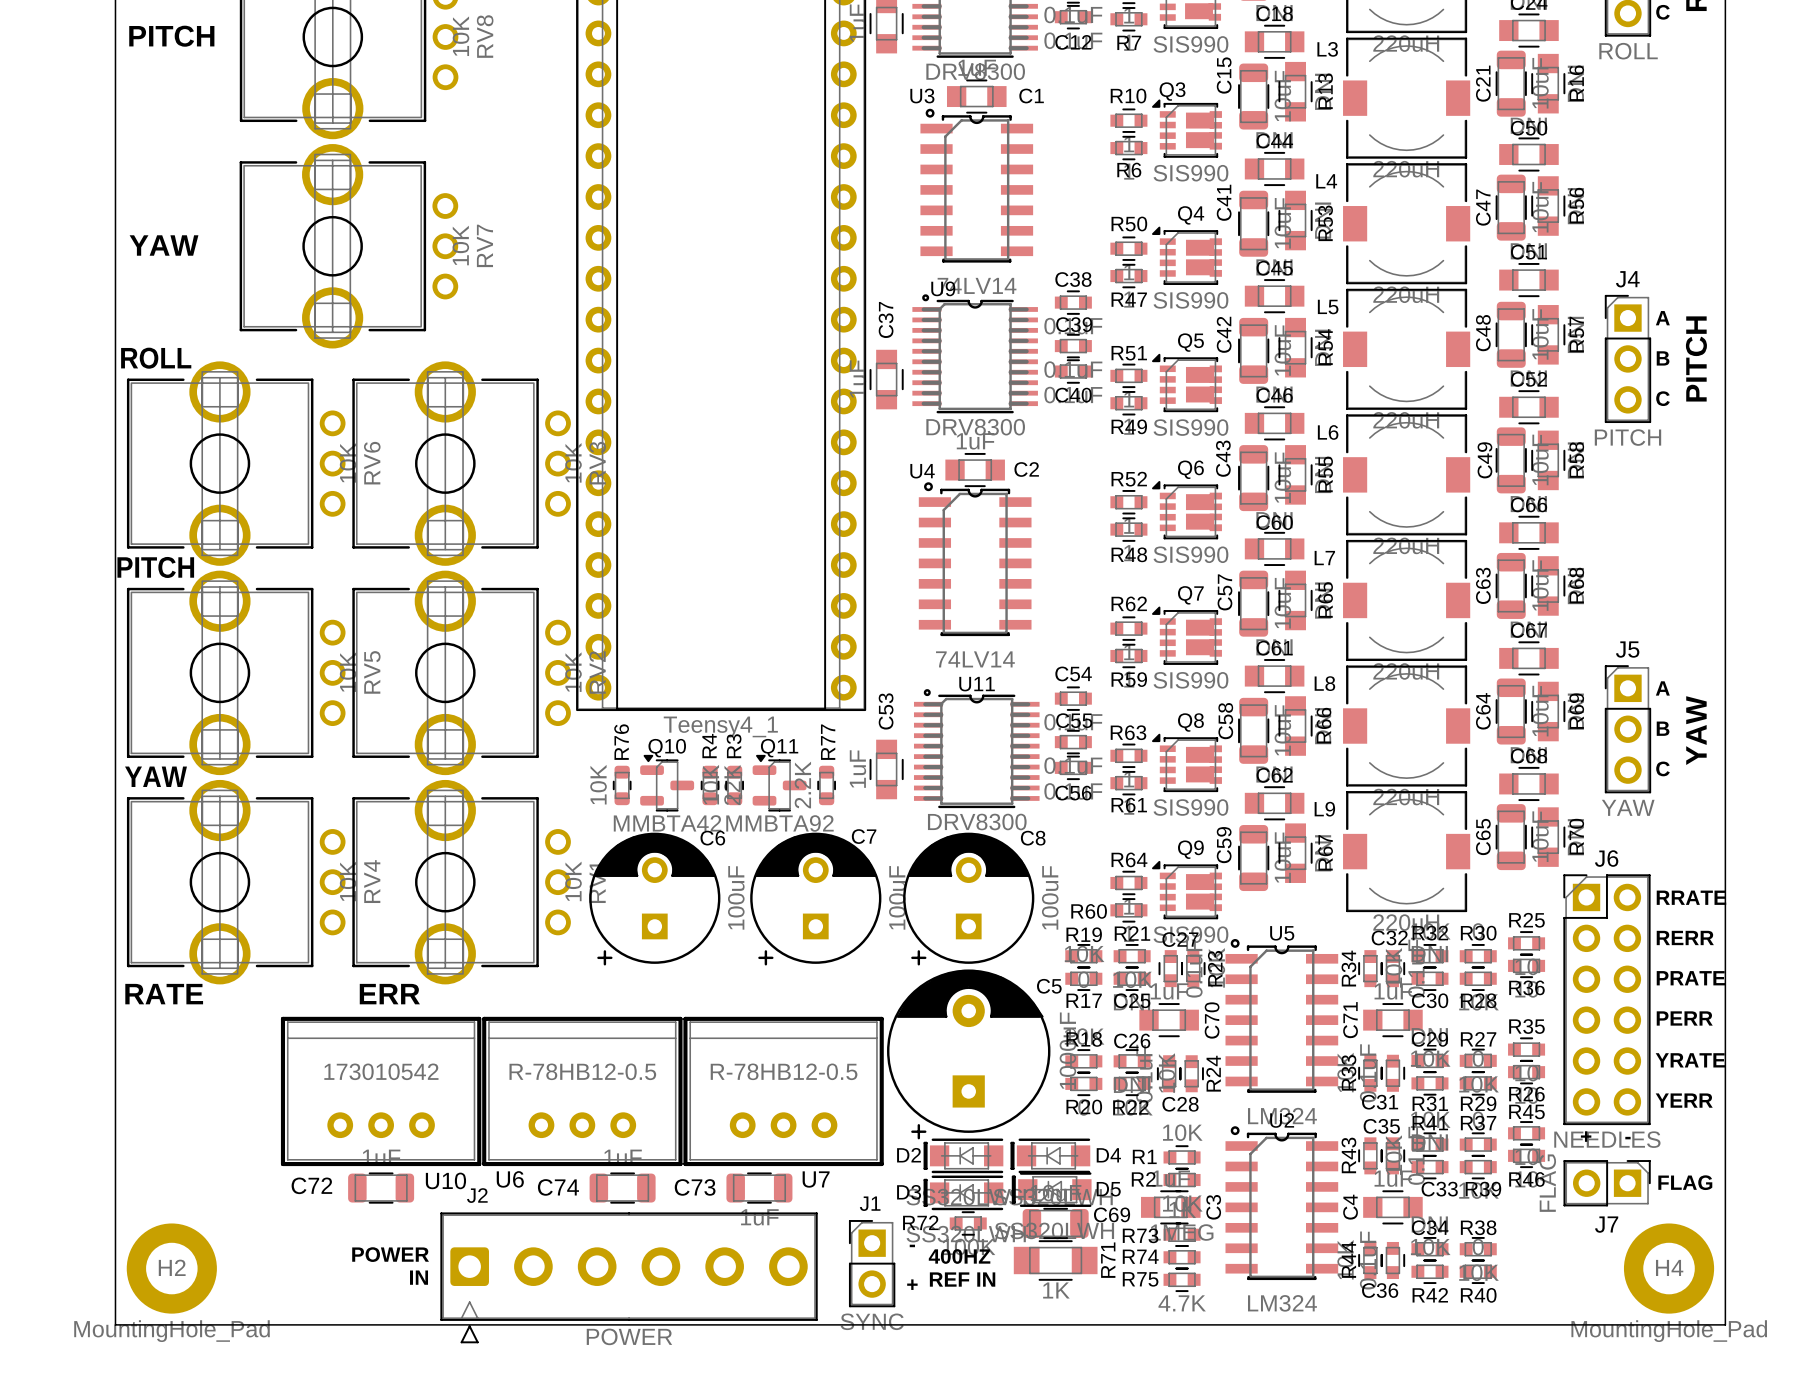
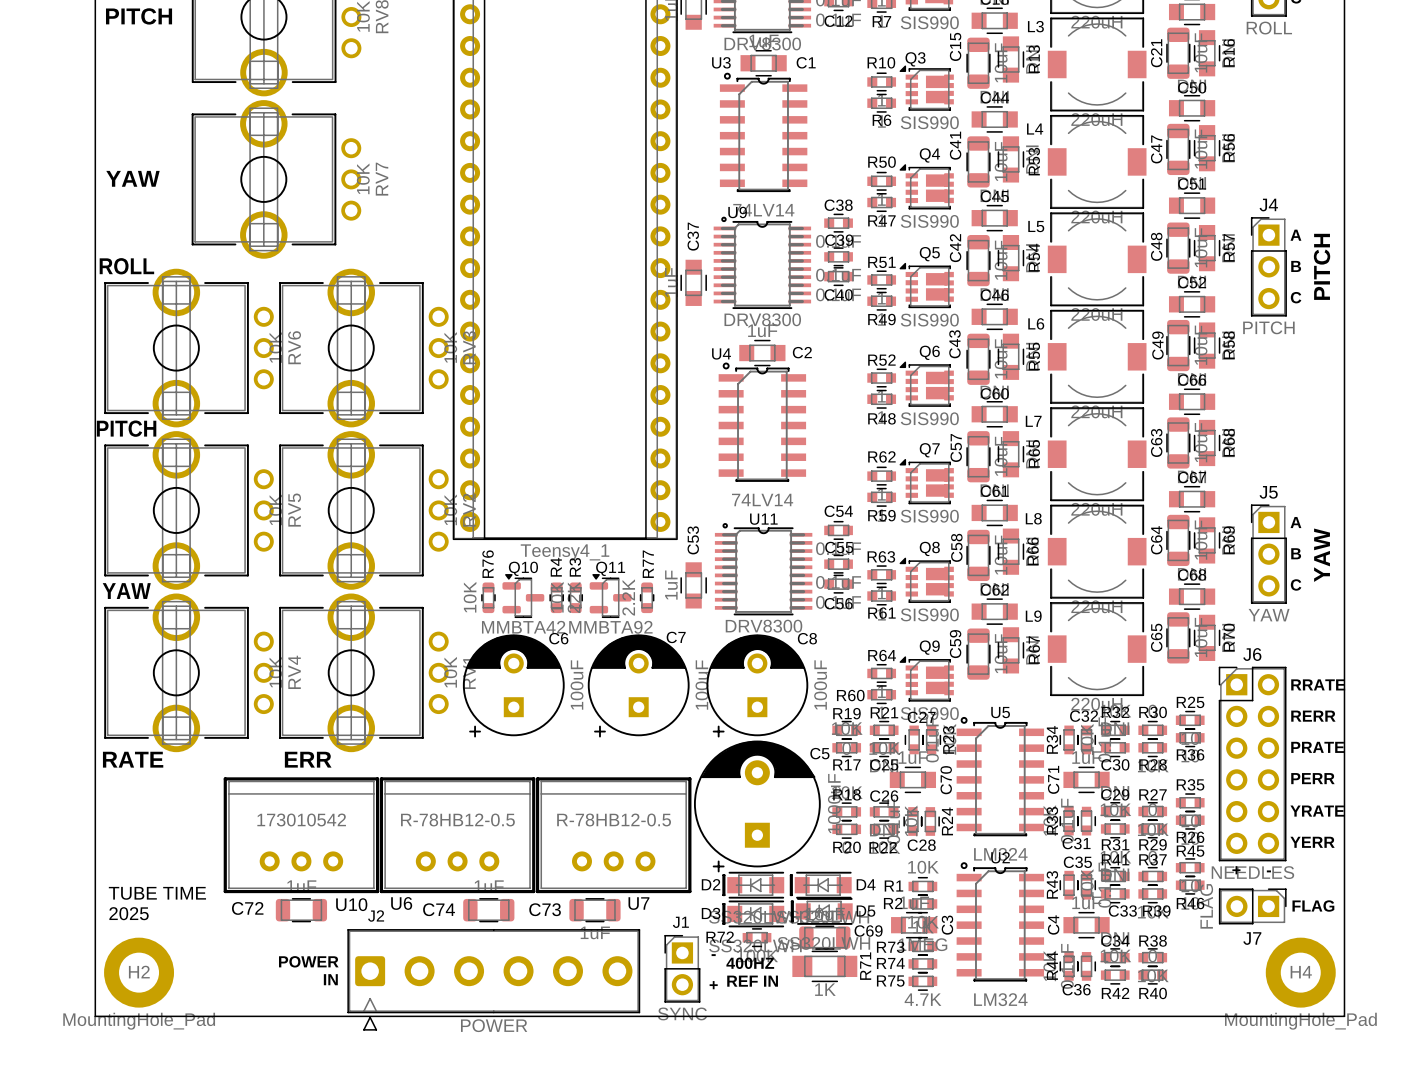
text: none -> TUBE TIME (157, 893)
text: none -> 2025 (129, 913)

